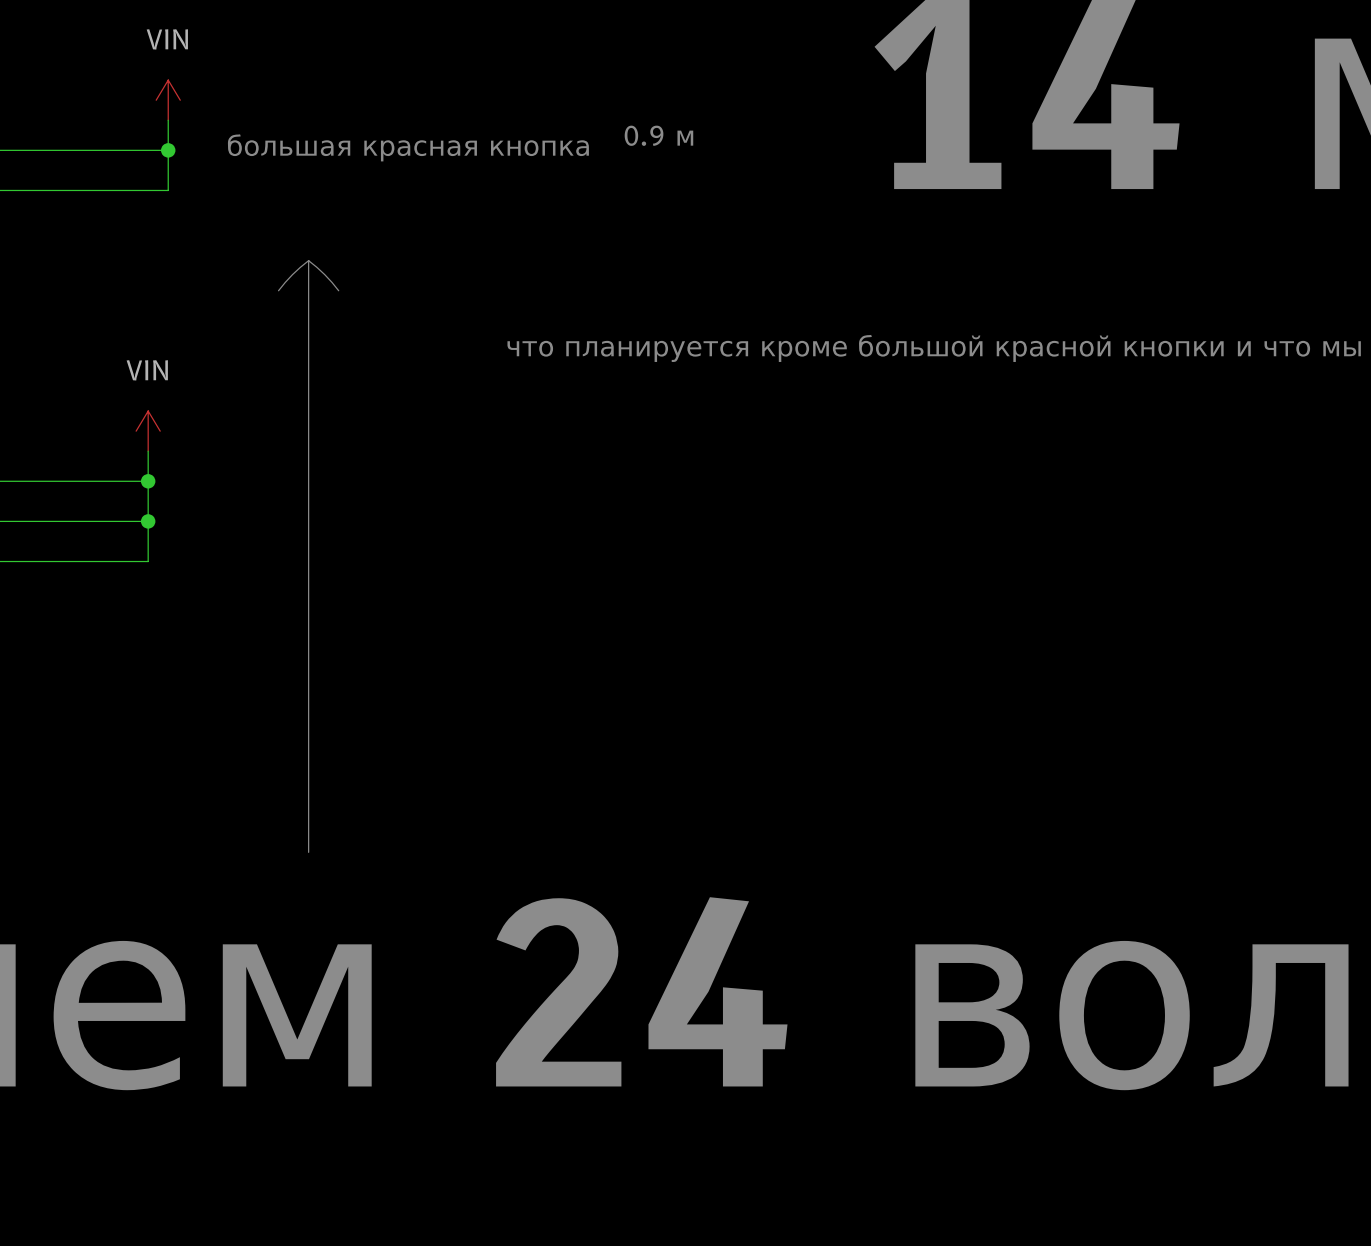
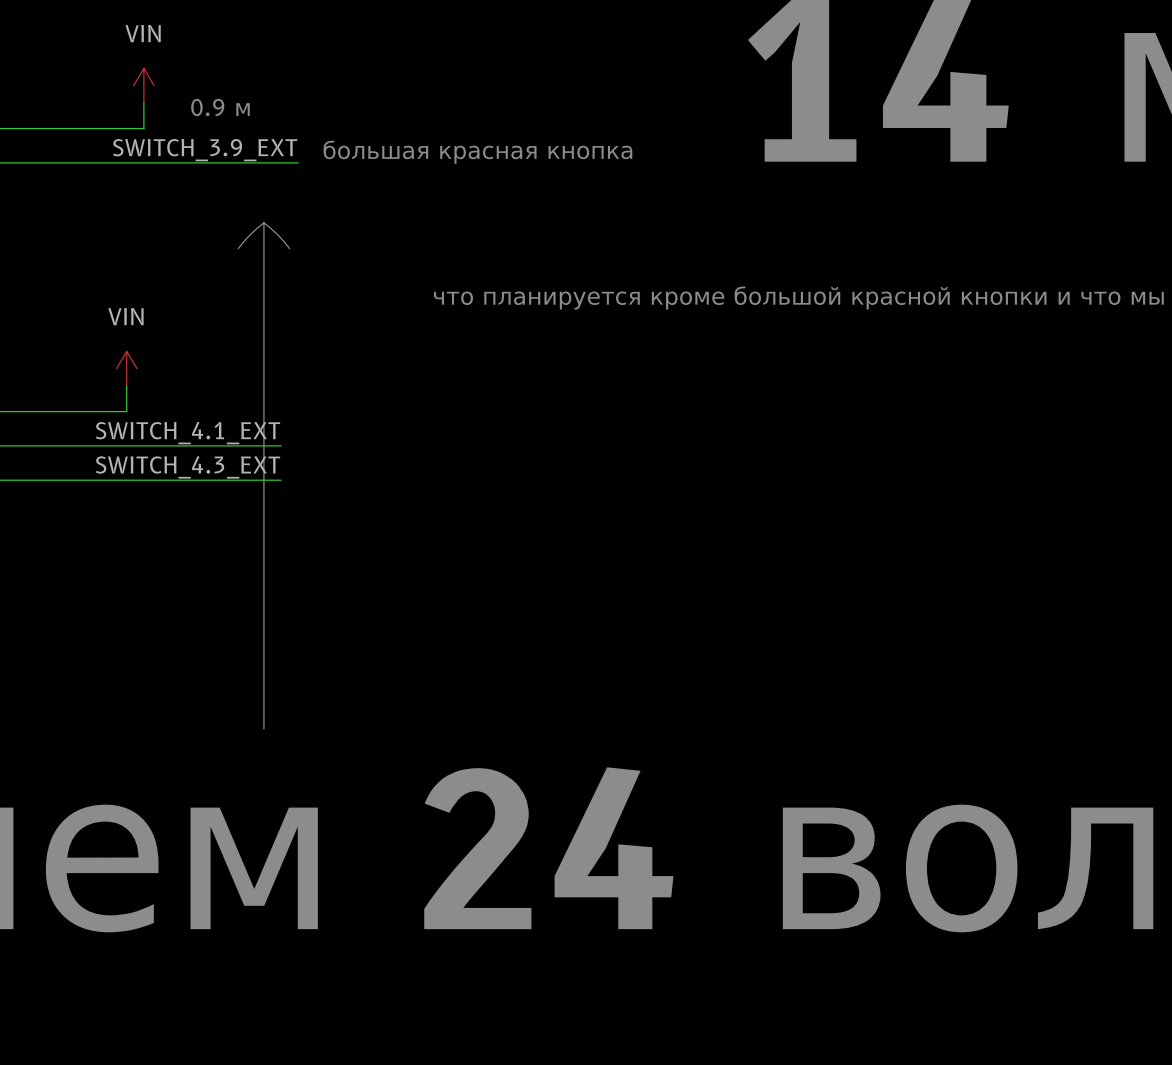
text: none -> 0.9 м (220, 107)
text: 0.9 м (658, 135) -> none
text position: большая красная кнопка (408, 147) -> большая красная кнопка (477, 152)
wire: (168, 150) (168, 190) -> (298, 162) (143, 162)
junction: (168, 150) -> none
label: none -> SWITCH_3.9_EXT (205, 150)
wire: (148, 481) (148, 561) -> (281, 480) (126, 480)
junction: (148, 481) -> none
label: none -> SWITCH_4.1_EXT (187, 433)
wire: none -> (126, 445) (281, 445)
junction: (148, 521) -> none
label: none -> SWITCH_4.3_EXT (187, 467)

